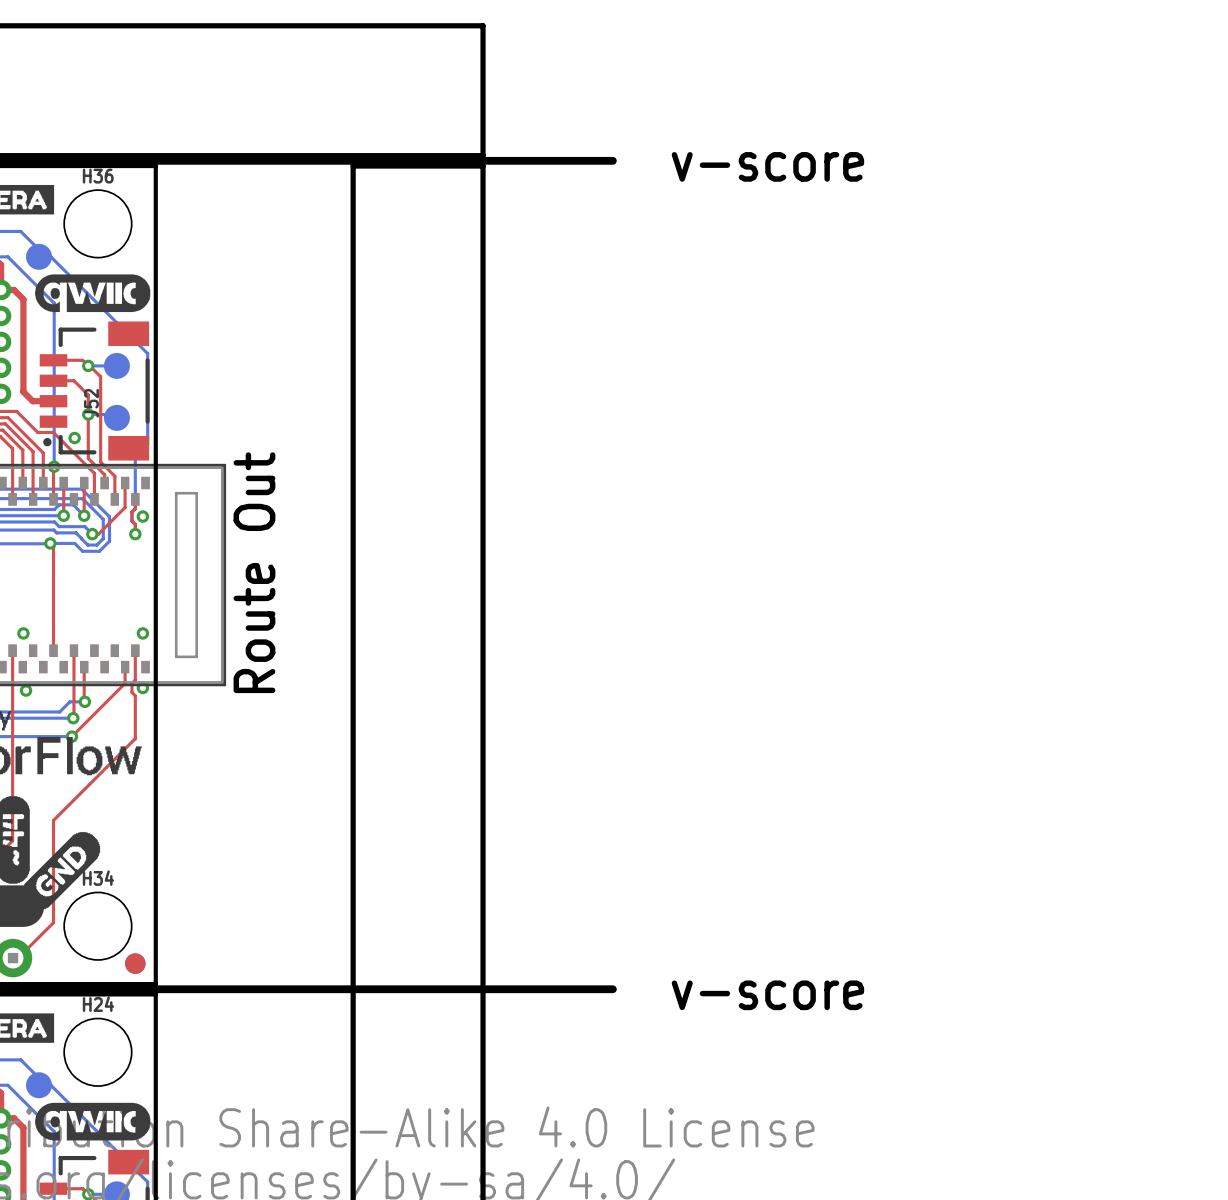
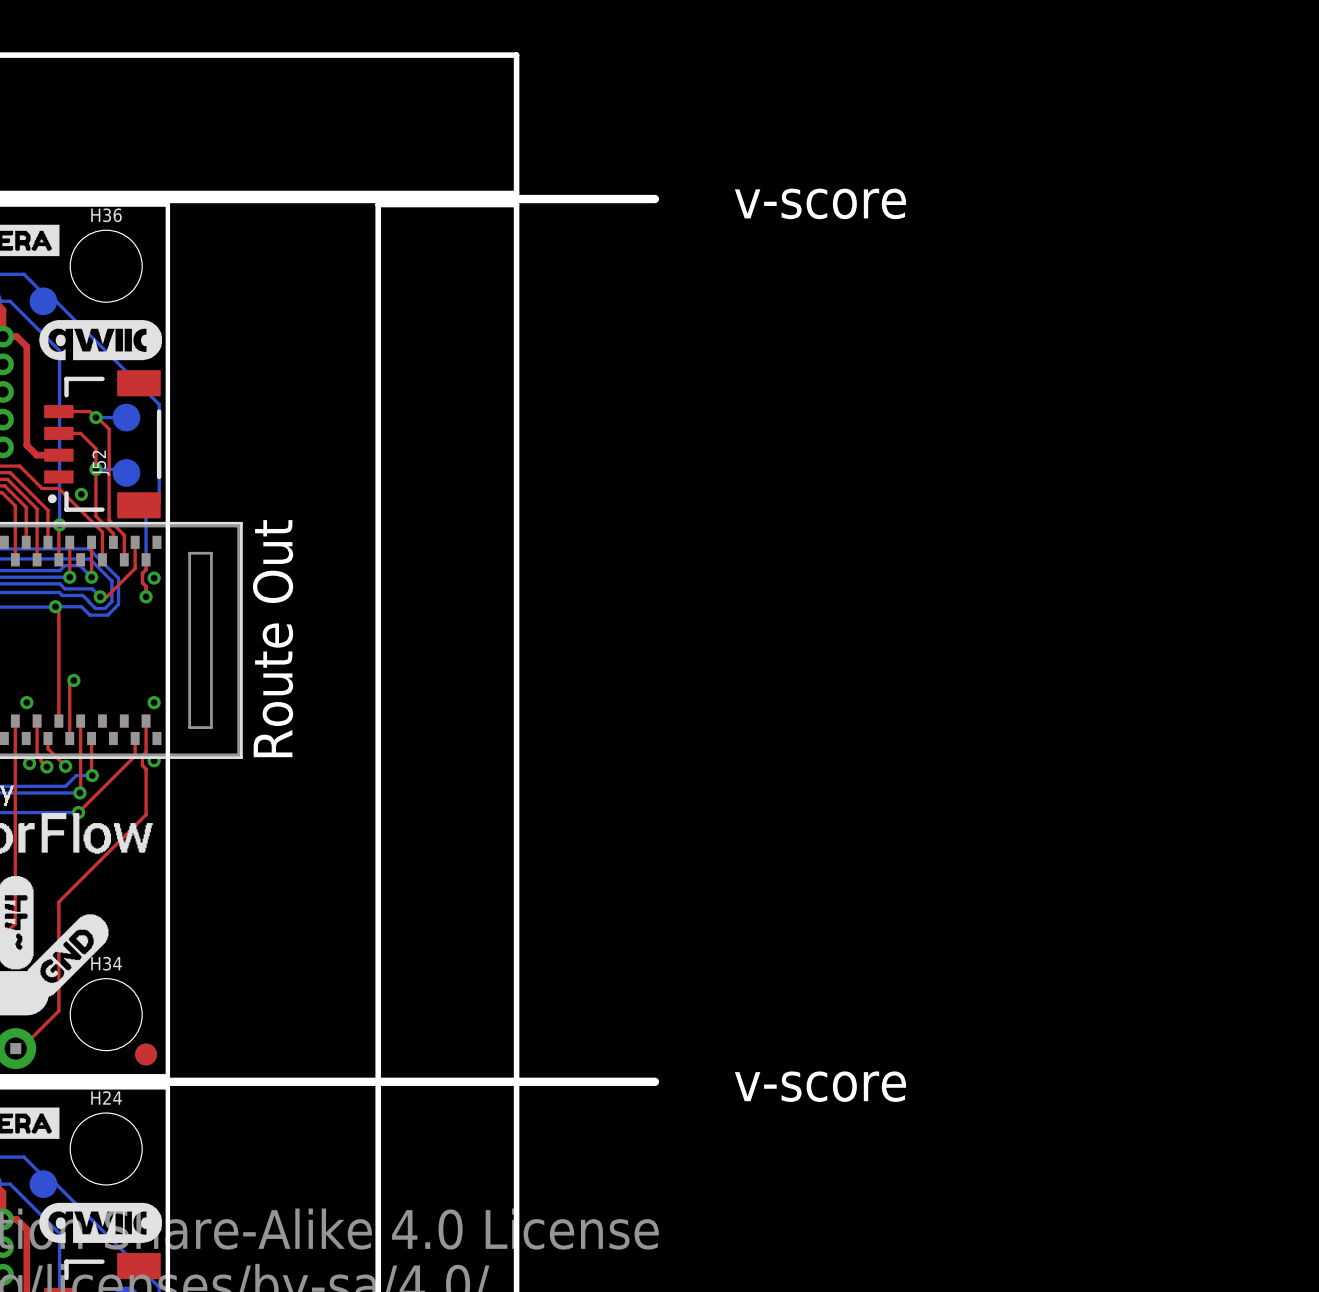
top track: none -> (73, 680) (69, 684) (69, 738)
via: none -> (73, 680)
top track: none -> (37, 721) (37, 754) (46, 766)
top track: none -> (47, 738) (47, 748) (65, 766)
via: none -> (46, 766)
via: none -> (65, 766)

